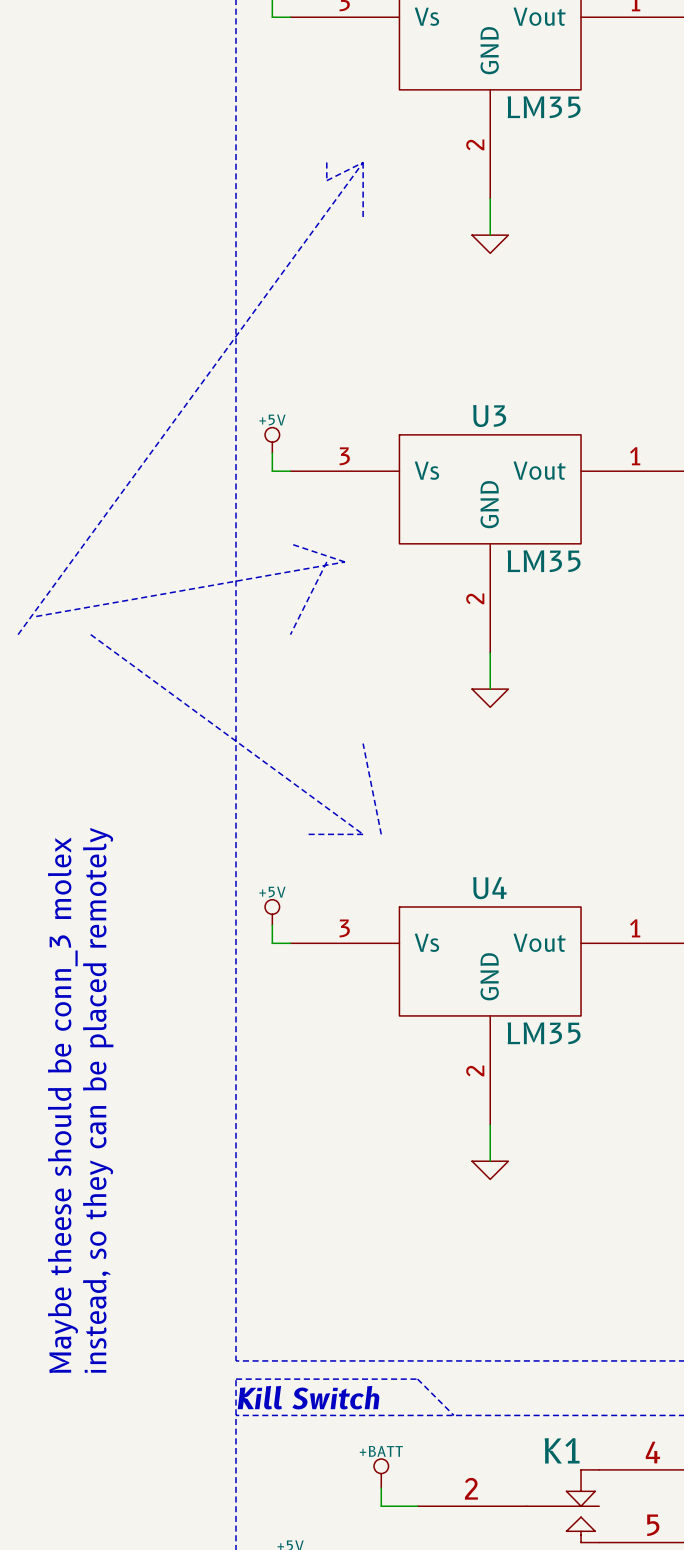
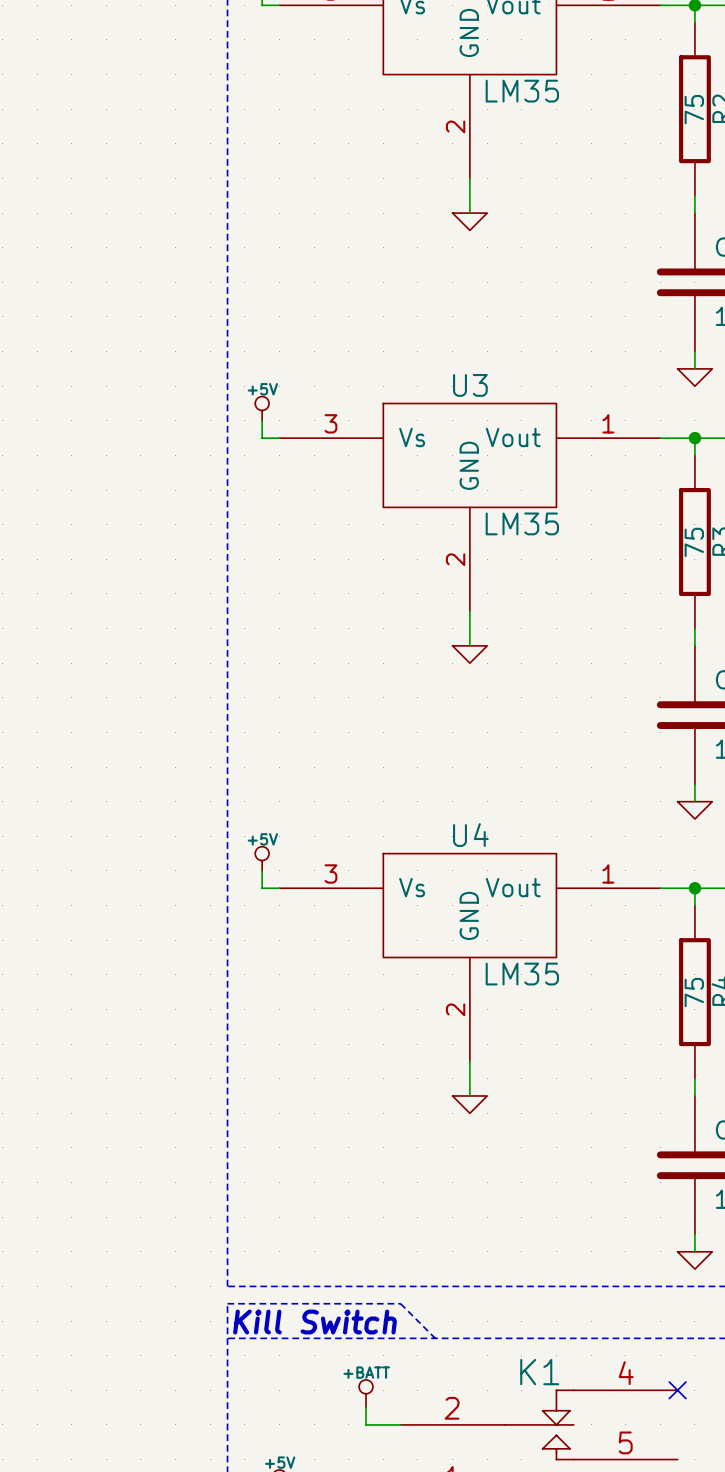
line: (326, 162) (326, 180) (363, 162) -> none
line: (363, 162) (18, 634) -> none
line: (363, 162) (363, 216) -> none
line: (290, 543) (344, 561) (36, 616) -> none
line: (326, 561) (290, 634) -> none
line: (90, 634) (363, 834) (308, 834) -> none
line: (363, 743) (381, 834) -> none
text: instead, so they can be placed remotely (98, 1100) -> none
text: Maybe theese should be conn_3 molex (62, 1105) -> none

